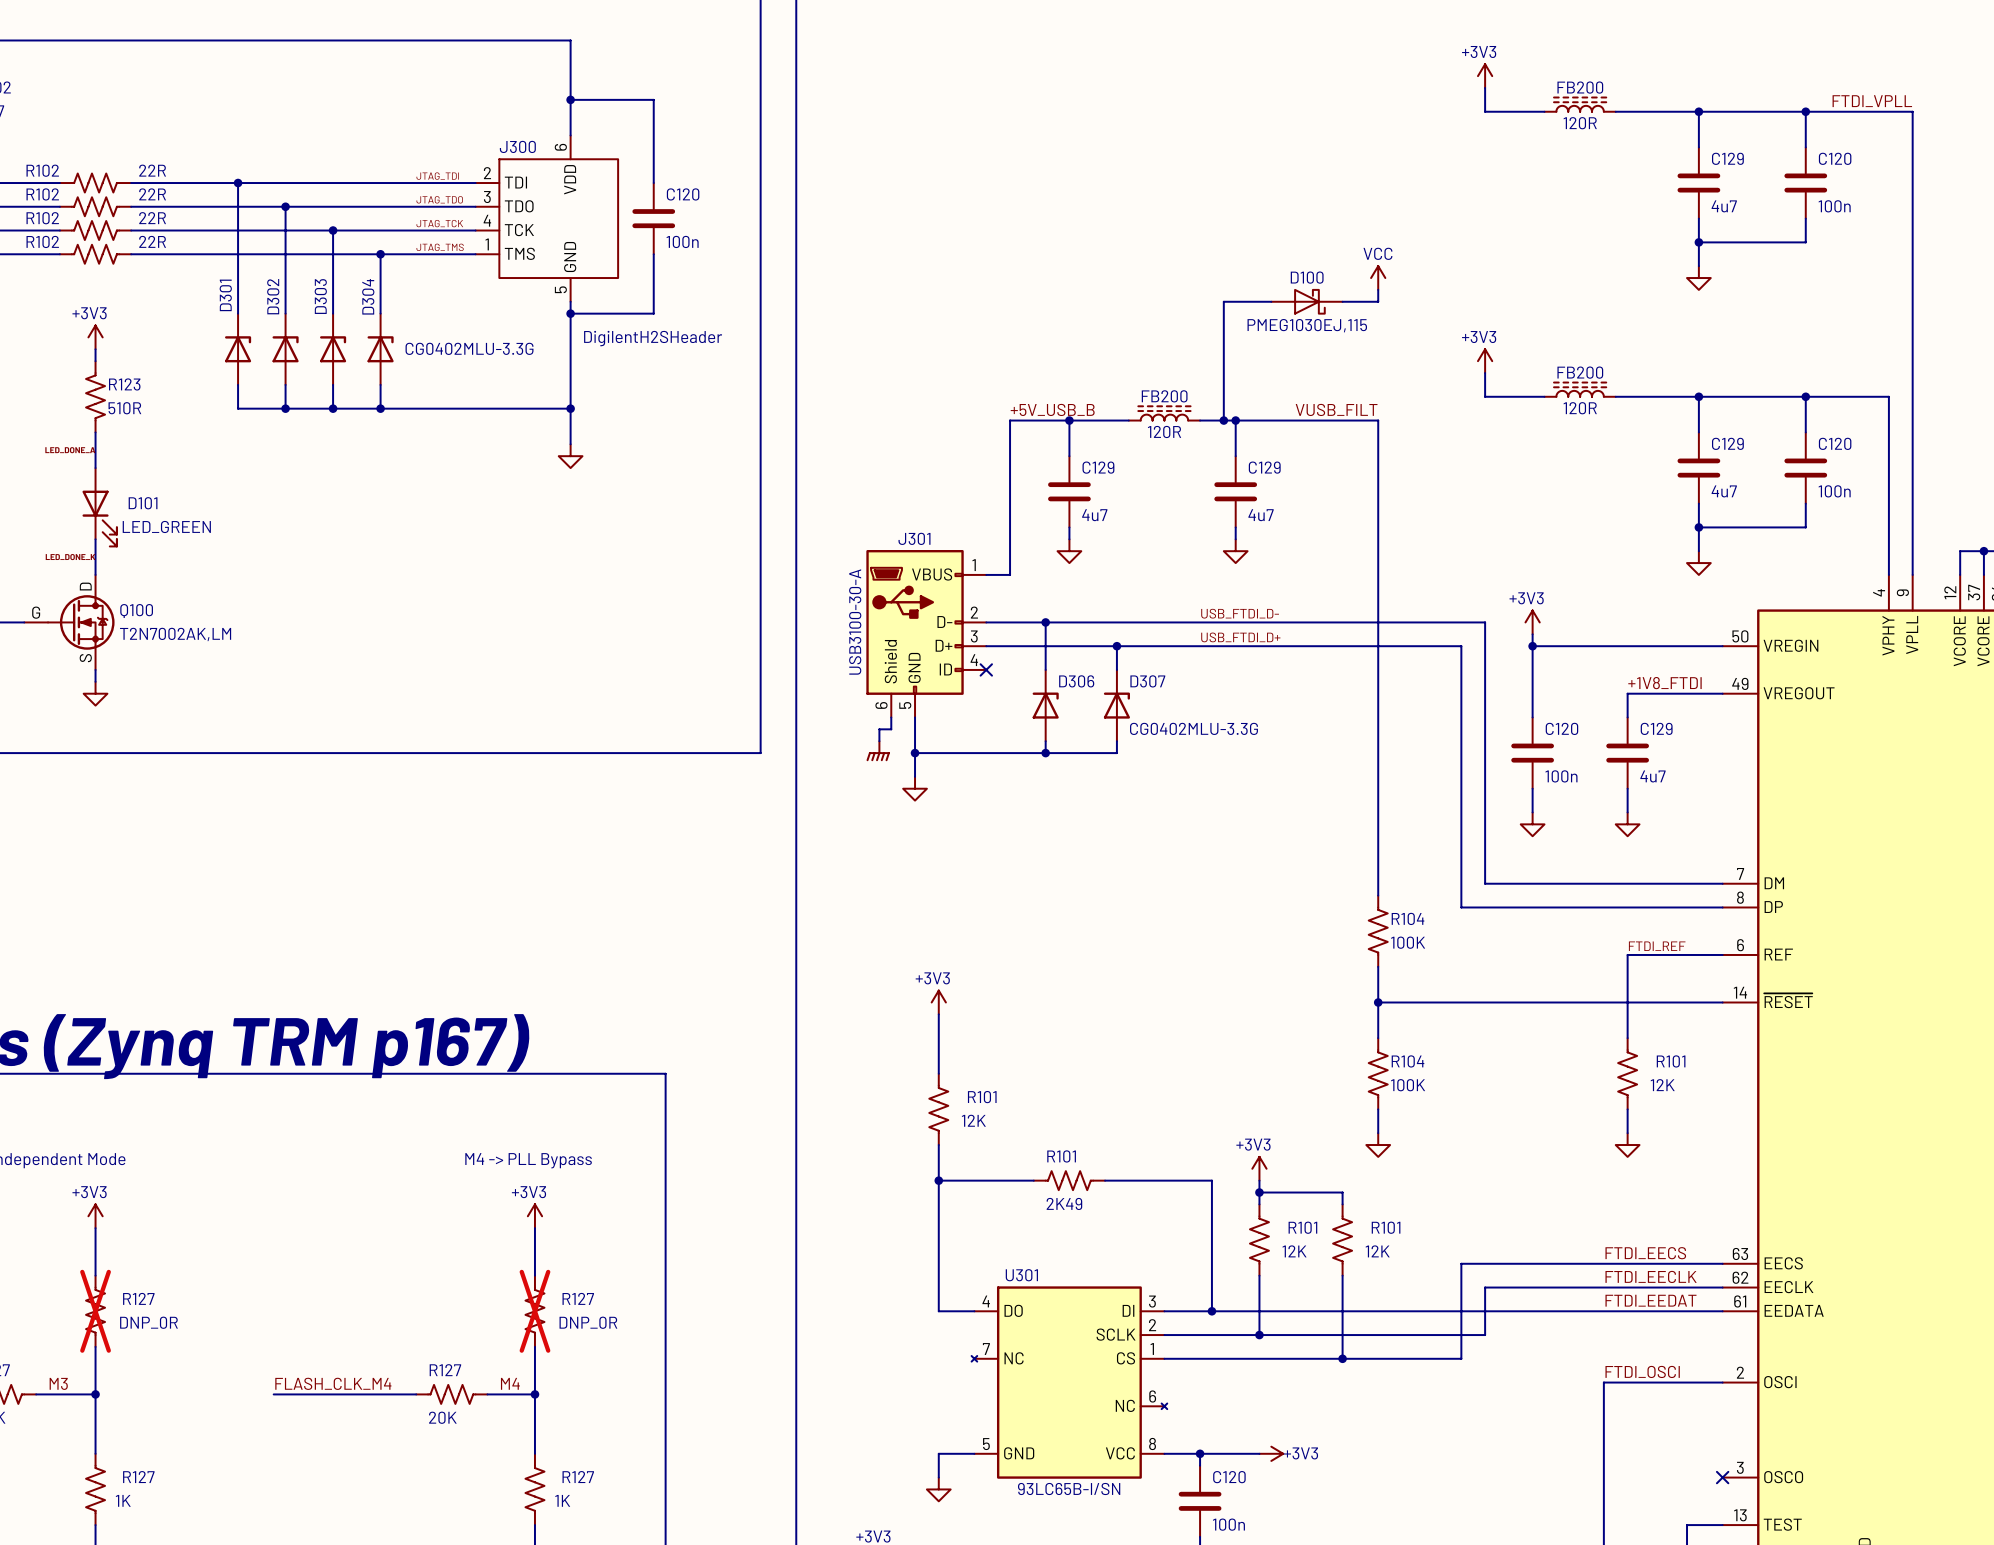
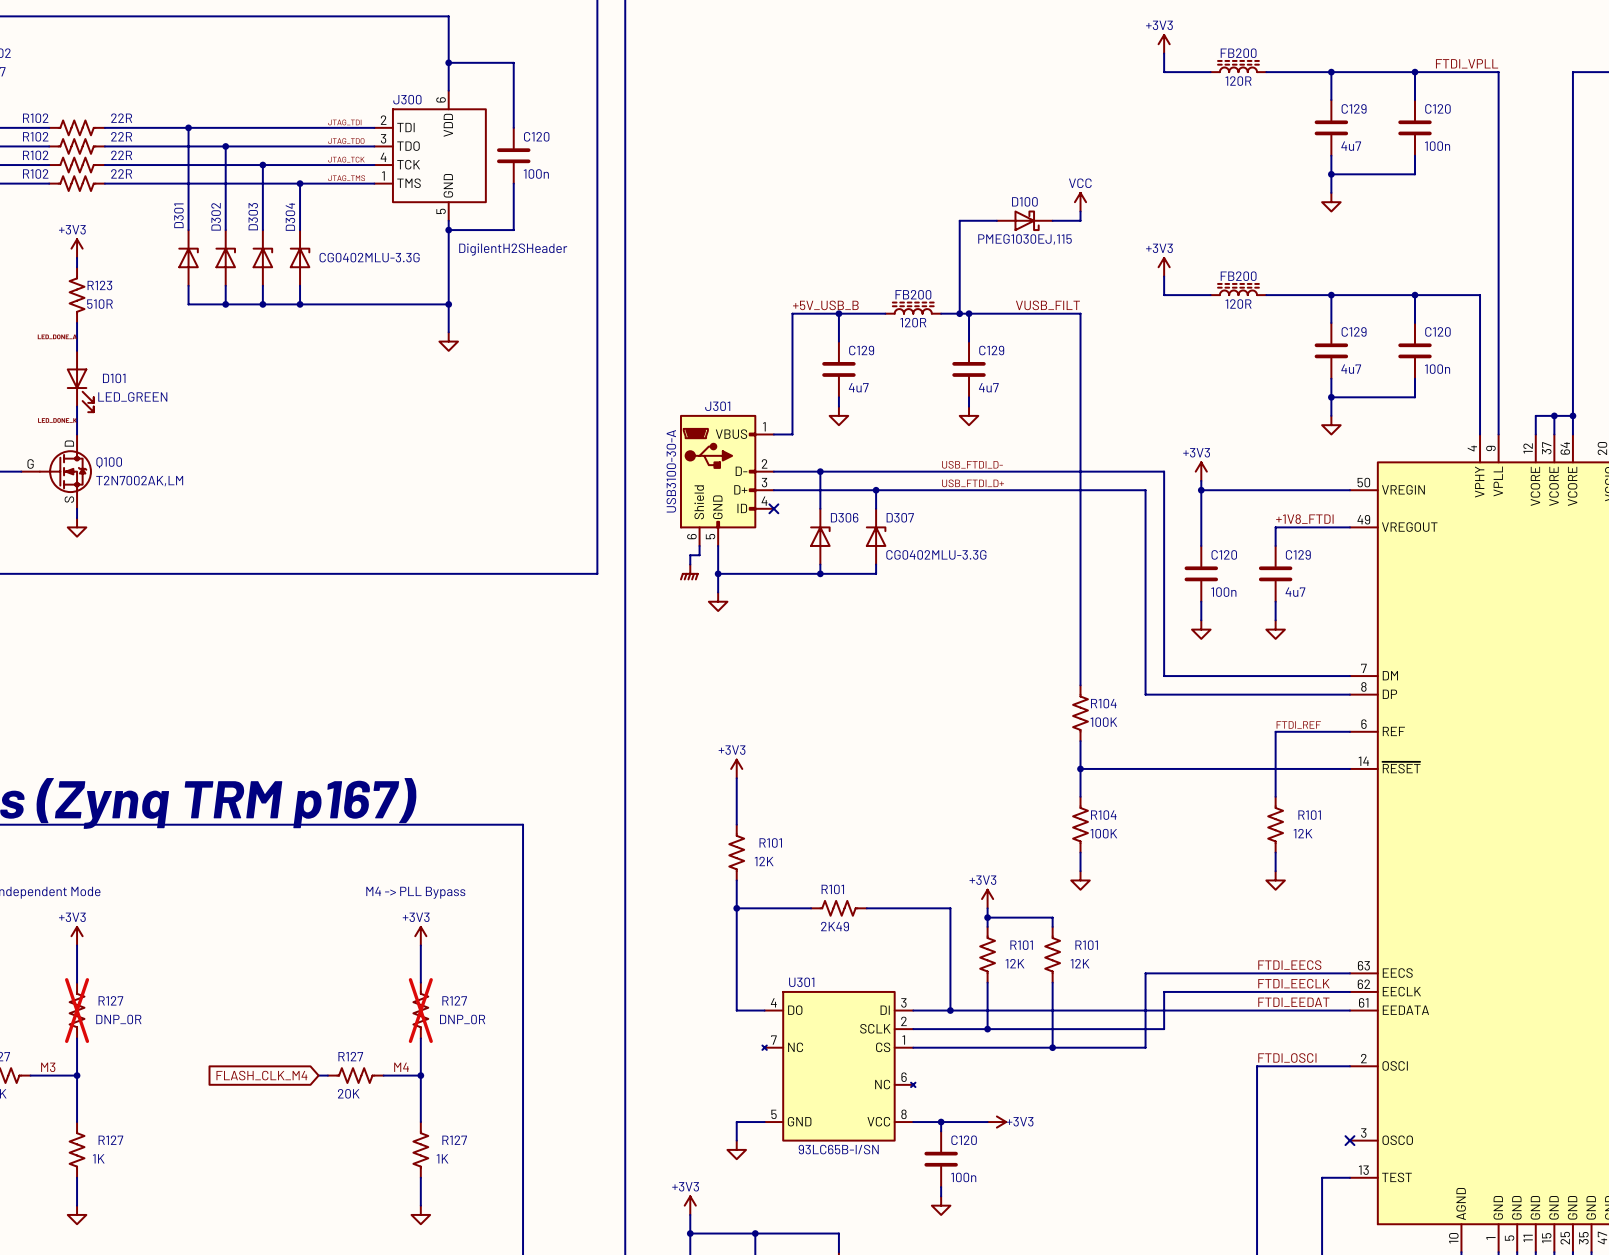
label: FLASH_CLK_M4 (333, 1383) -> none
wire: (273, 1394) (404, 1394) -> none
global label: none -> FLASH_CLK_M4 (261, 1075)

